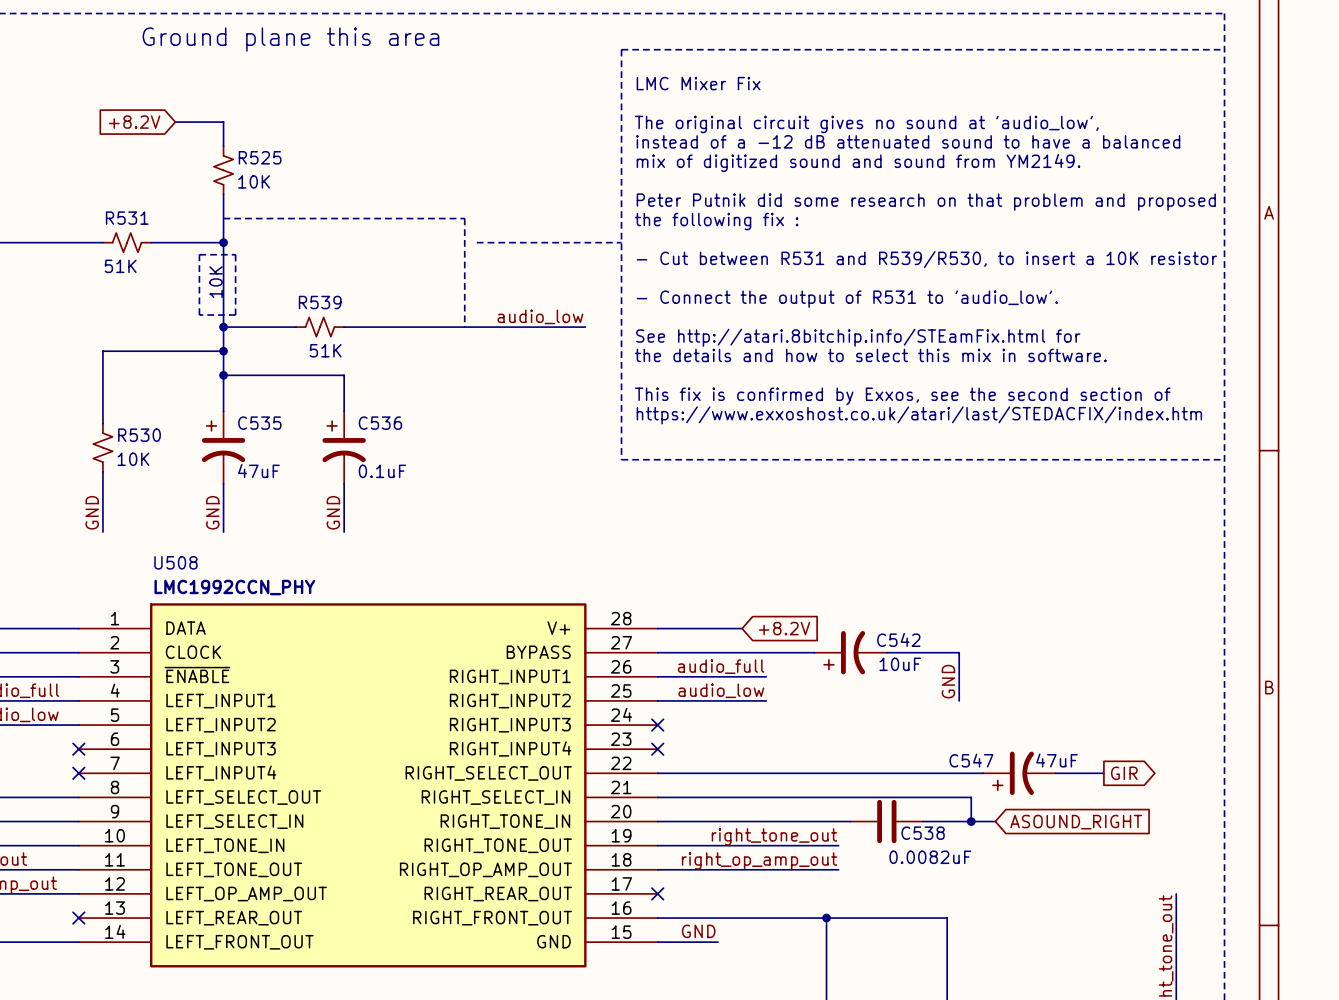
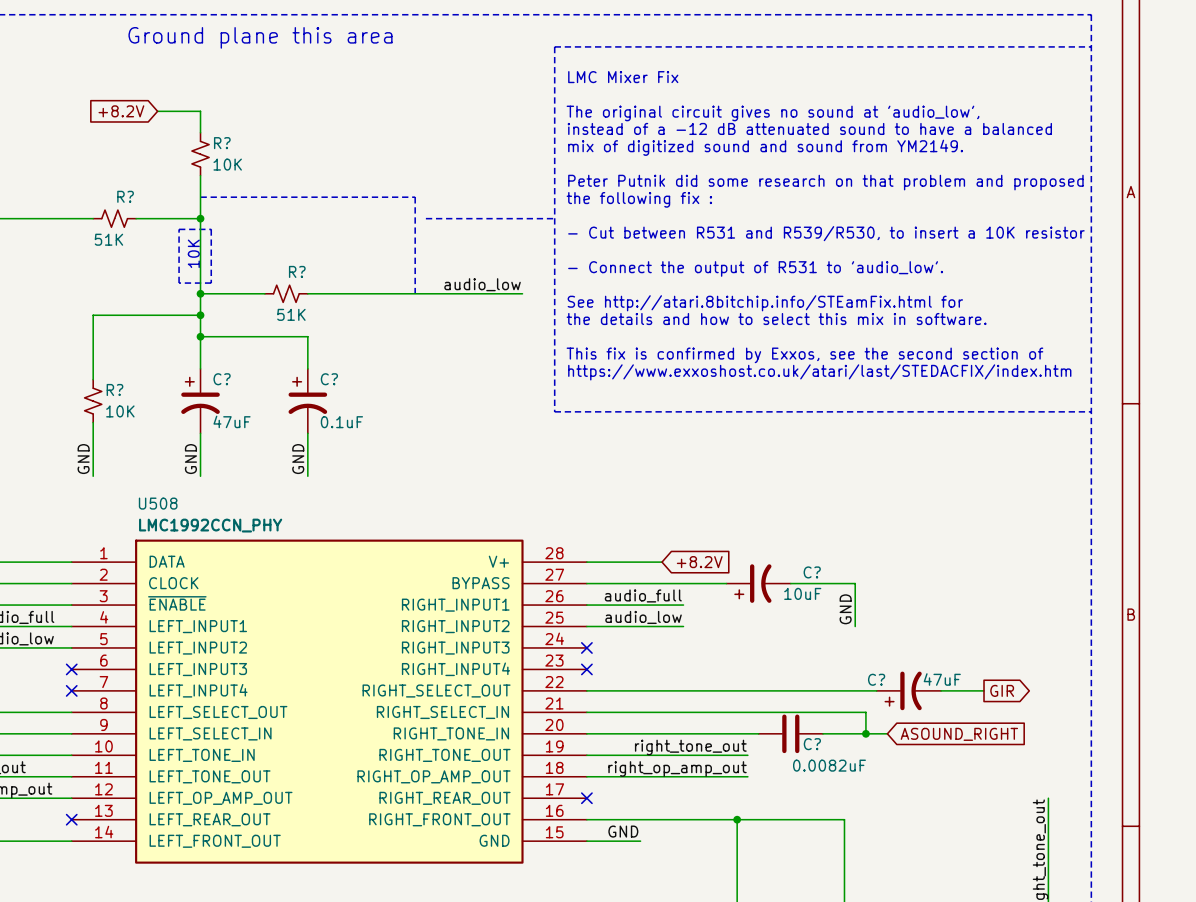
R525 name: R525 (260, 157) -> R? (222, 143)
R531 name: R531 (127, 218) -> R? (125, 196)
R539 name: R539 (320, 302) -> R? (297, 271)
C535 name: C535 (259, 423) -> C? (222, 379)
C536 name: C536 (380, 423) -> C? (329, 379)
R530 name: R530 (139, 435) -> R? (114, 389)
C542 name: C542 (898, 639) -> C? (812, 572)
C547 name: C547 (971, 760) -> C? (876, 679)
C538 name: C538 (923, 833) -> C? (812, 744)

